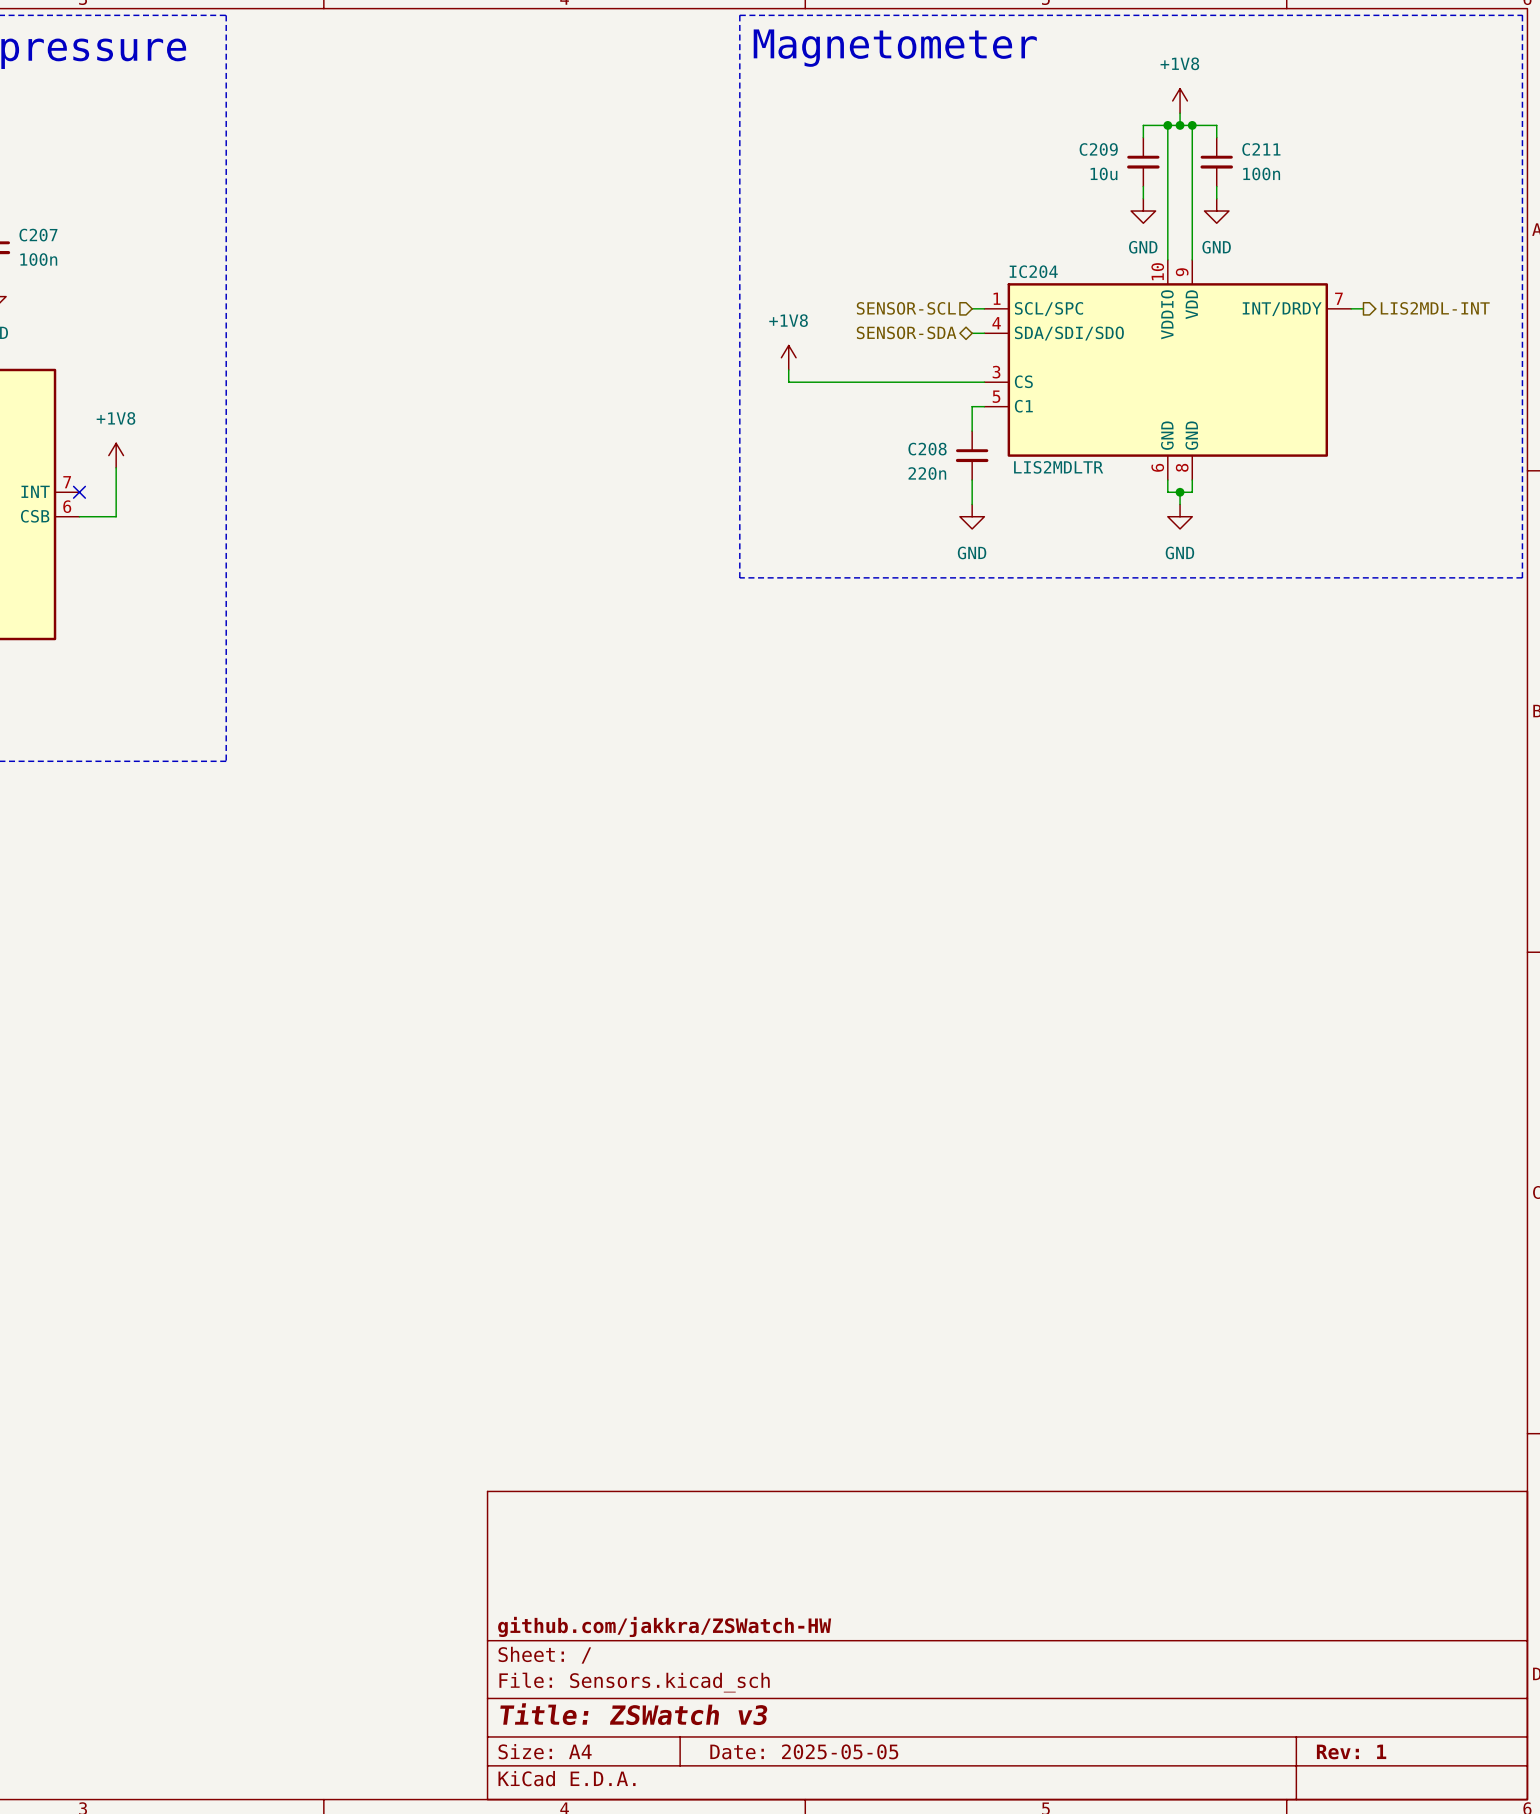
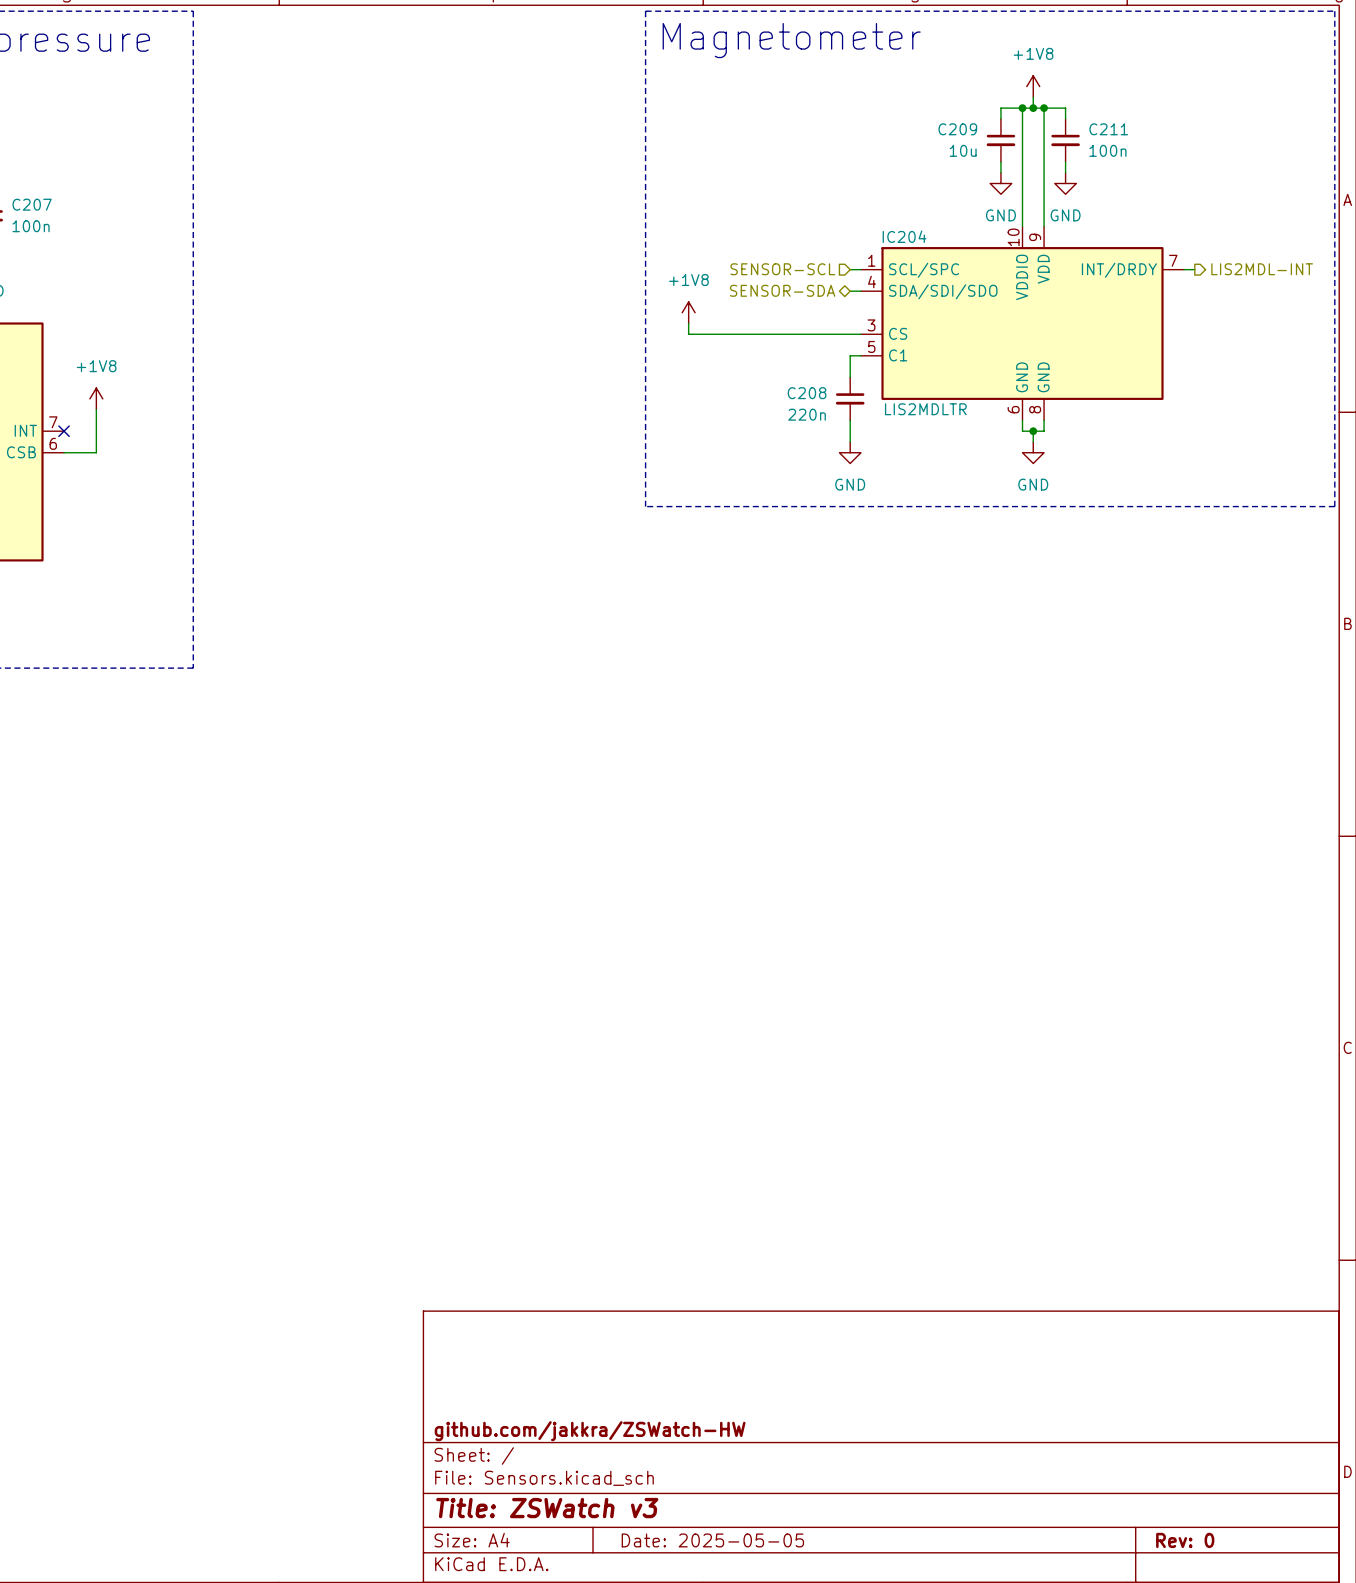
title block: Rev: 1 (1351, 1751) -> Rev: 0 (1185, 1540)

